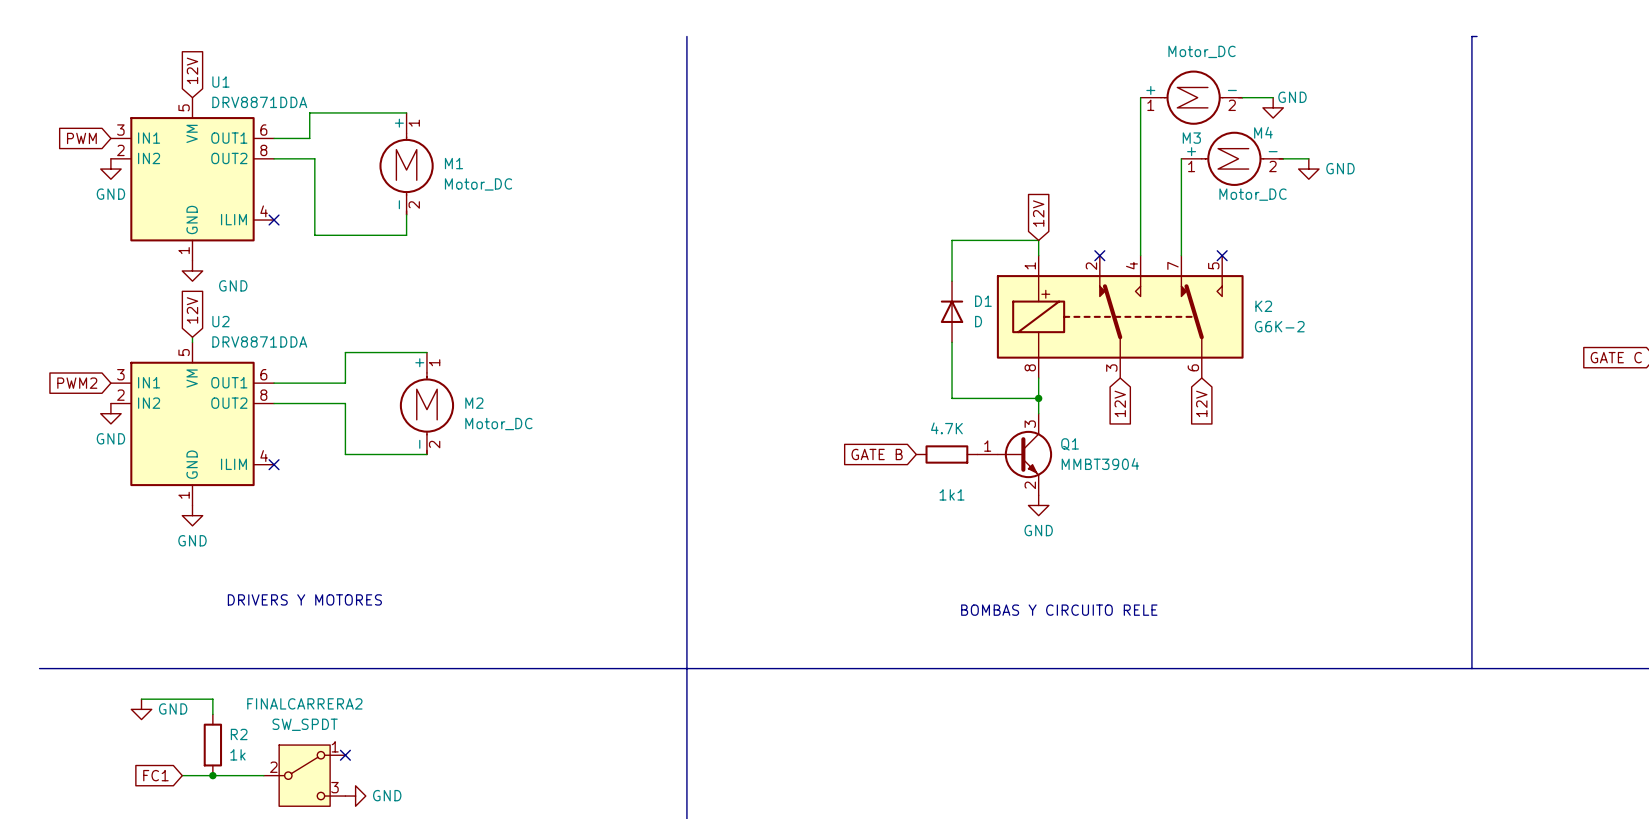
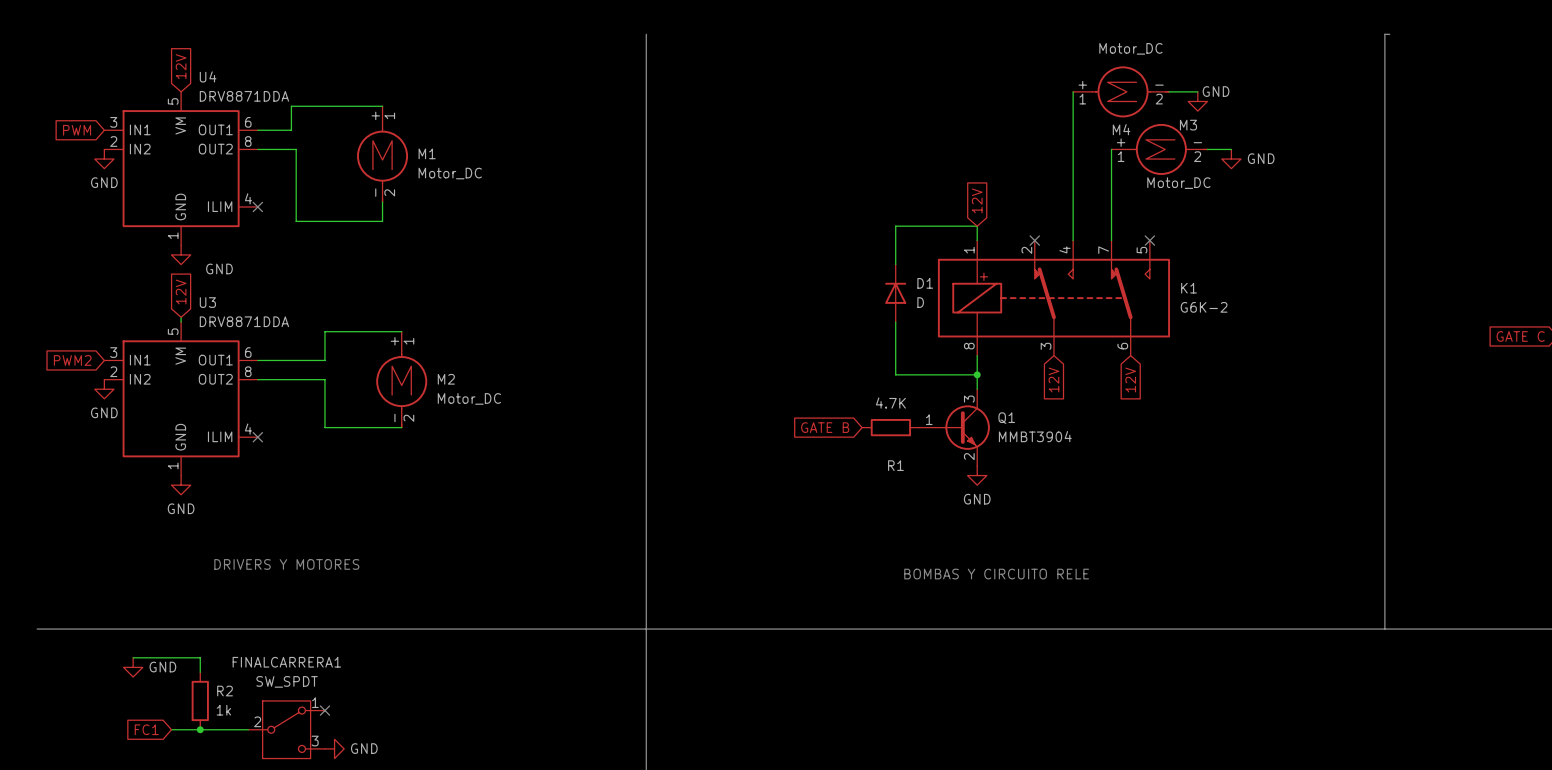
U1 name: U1 (220, 82) -> U4 (208, 76)
M4 name: M4 (1263, 132) -> M3 (1188, 125)
M3 name: M3 (1191, 138) -> M4 (1121, 129)
K2 name: K2 (1263, 306) -> K1 (1189, 288)
U2 name: U2 (220, 321) -> U3 (207, 302)
1k1 name: 1k1 (952, 494) -> R1 (895, 465)
FINALCARRERA2 name: FINALCARRERA2 (304, 703) -> FINALCARRERA1 (286, 662)

